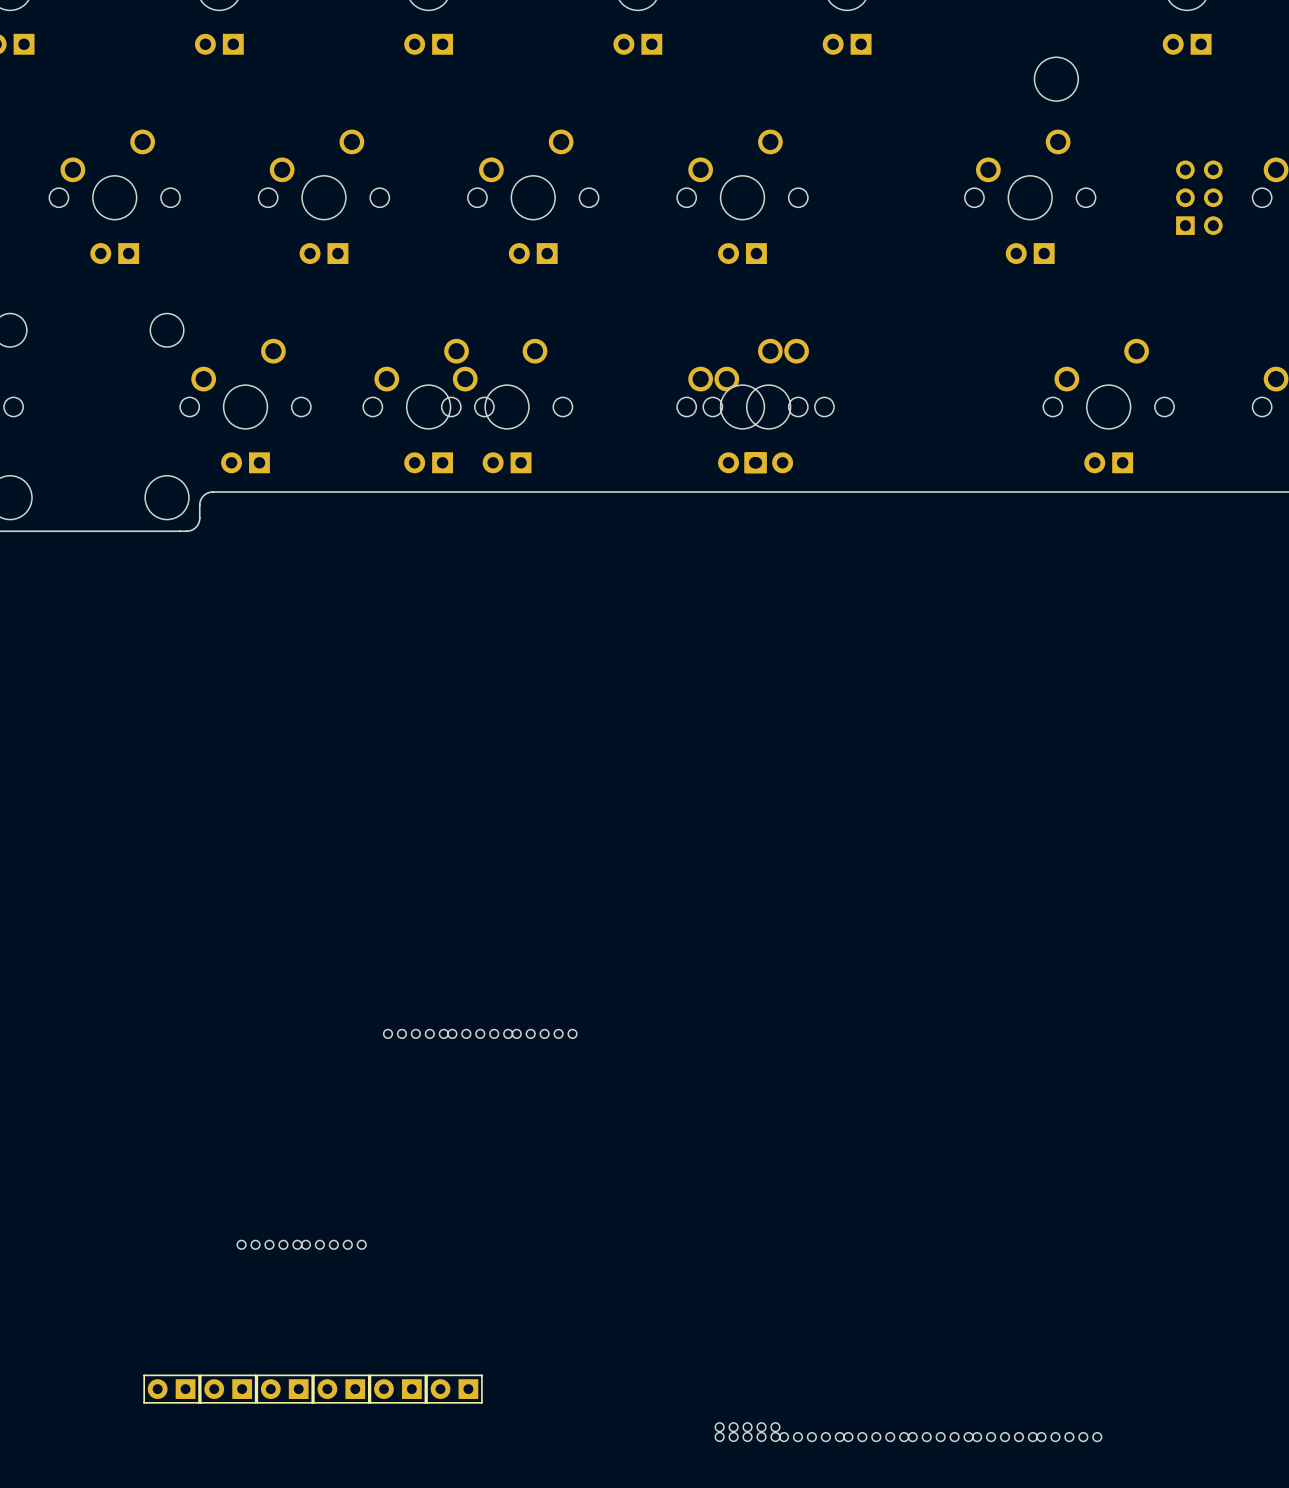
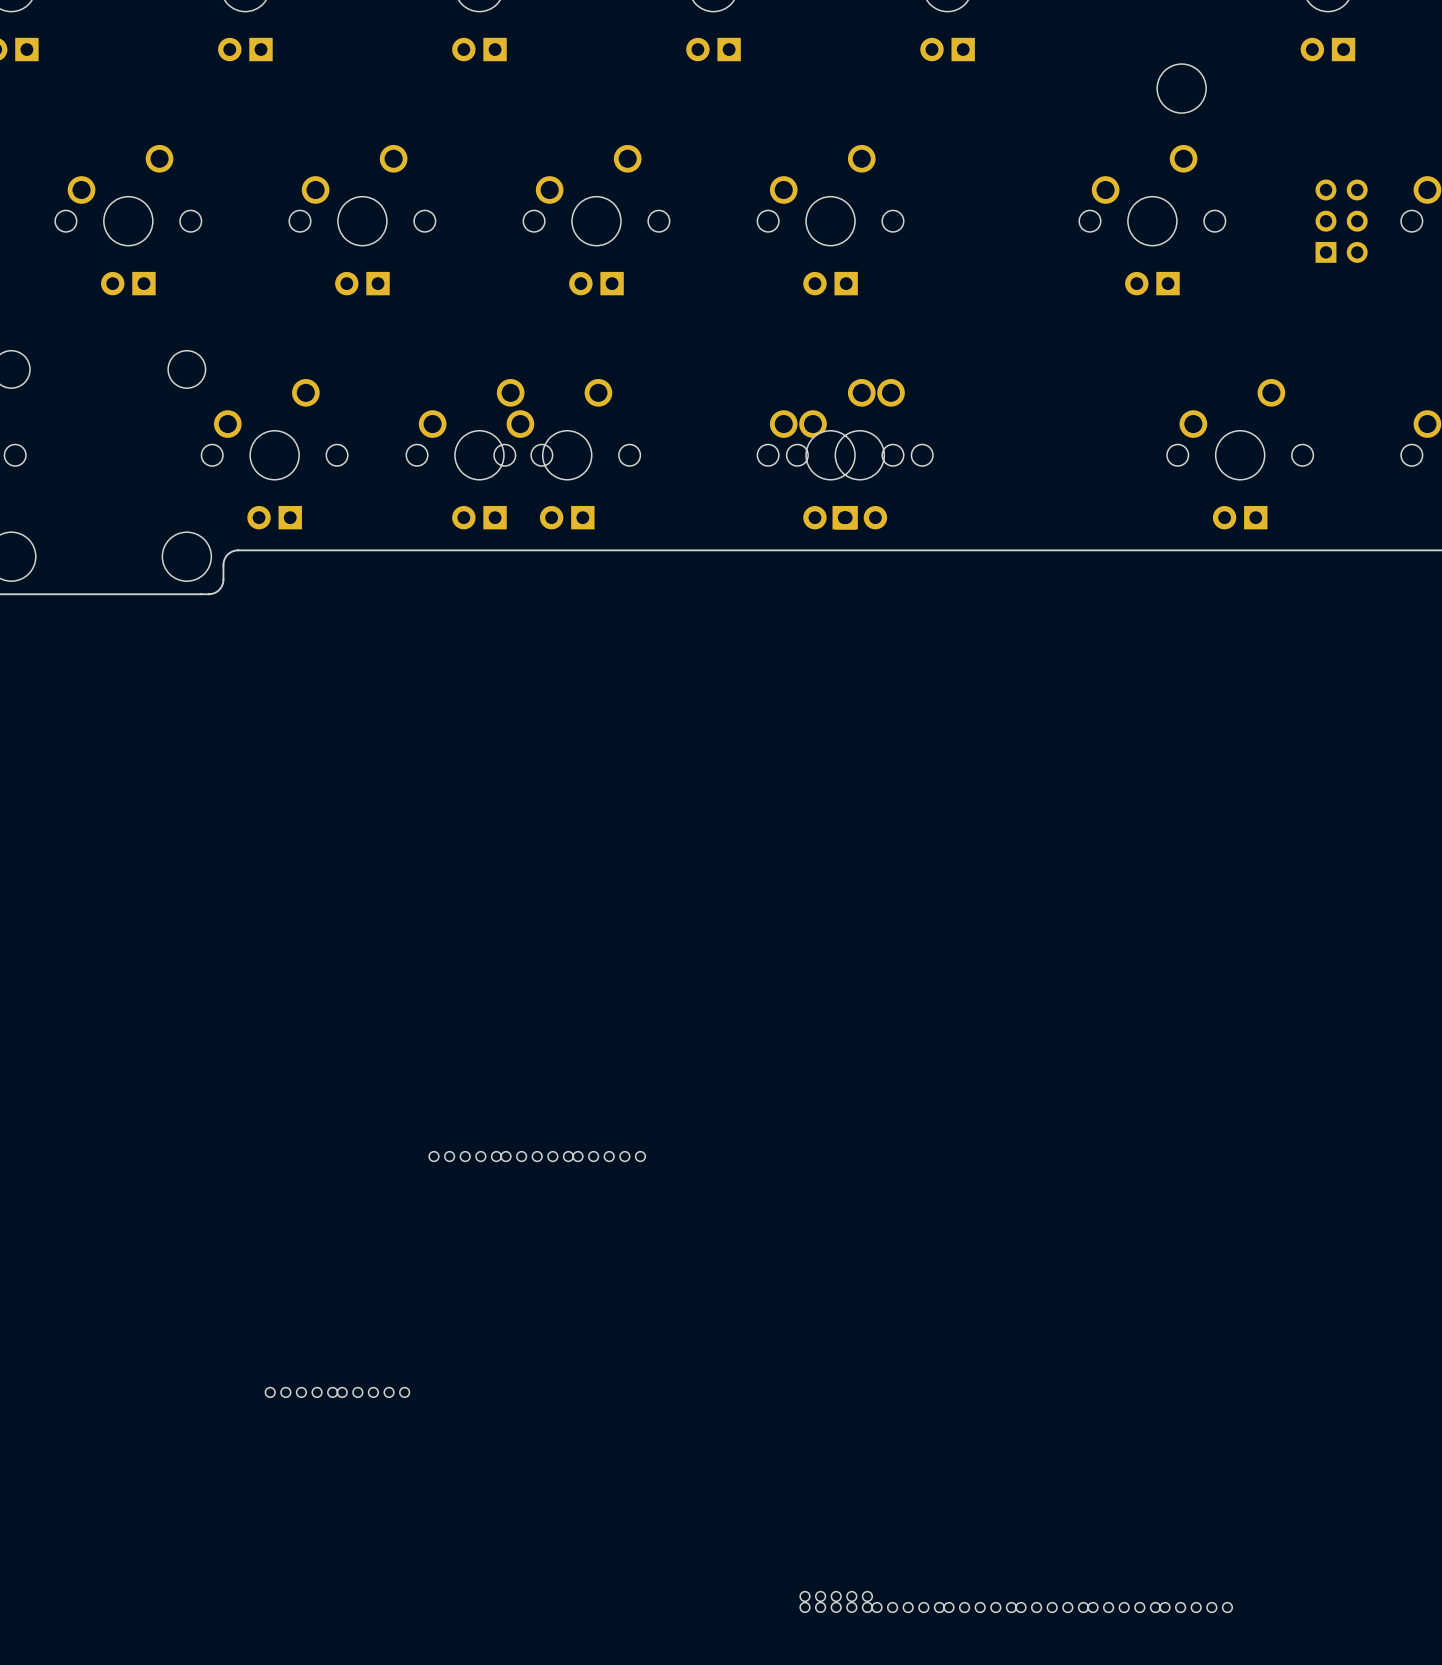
part: (171, 1389) -> none
part: (228, 1389) -> none
part: (284, 1389) -> none
part: (341, 1389) -> none
part: (397, 1389) -> none
part: (454, 1389) -> none

